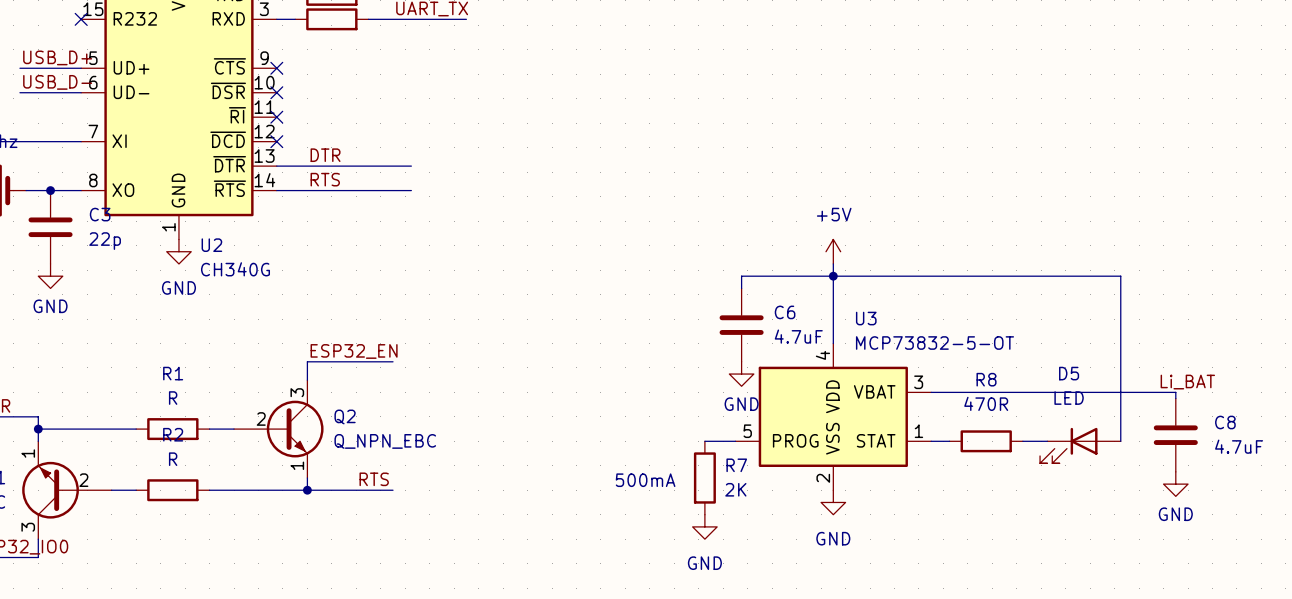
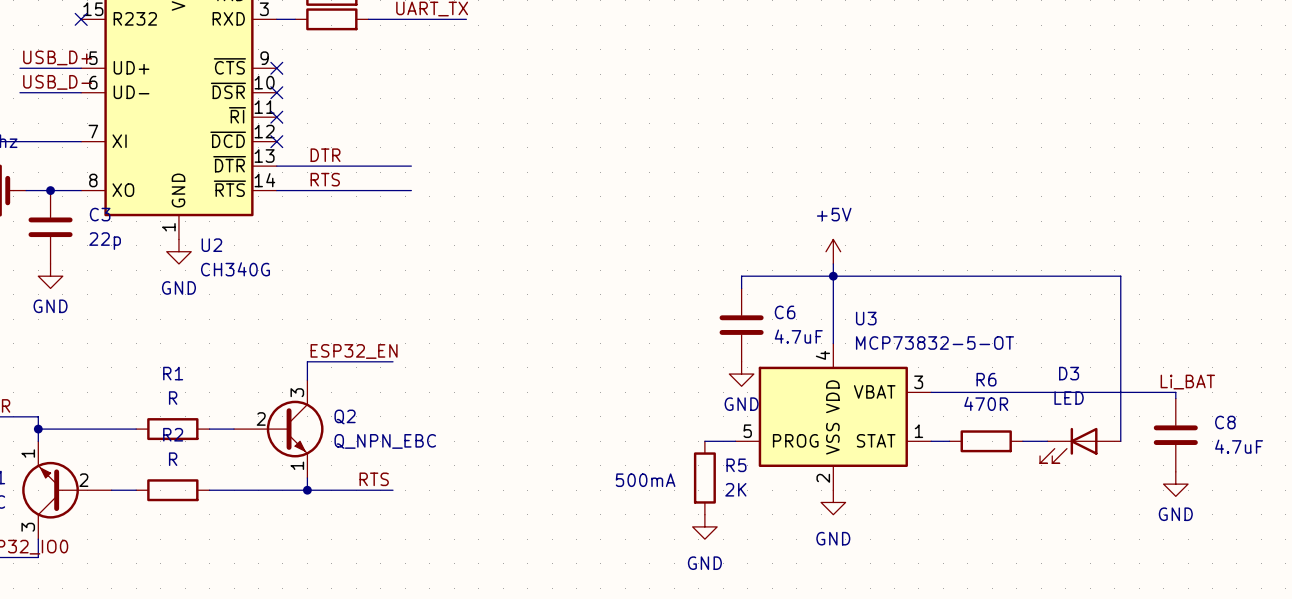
D5 name: D5 (1069, 373) -> D3 (1069, 373)
R8 name: R8 (986, 379) -> R6 (986, 379)
R7 name: R7 (736, 465) -> R5 (736, 465)

